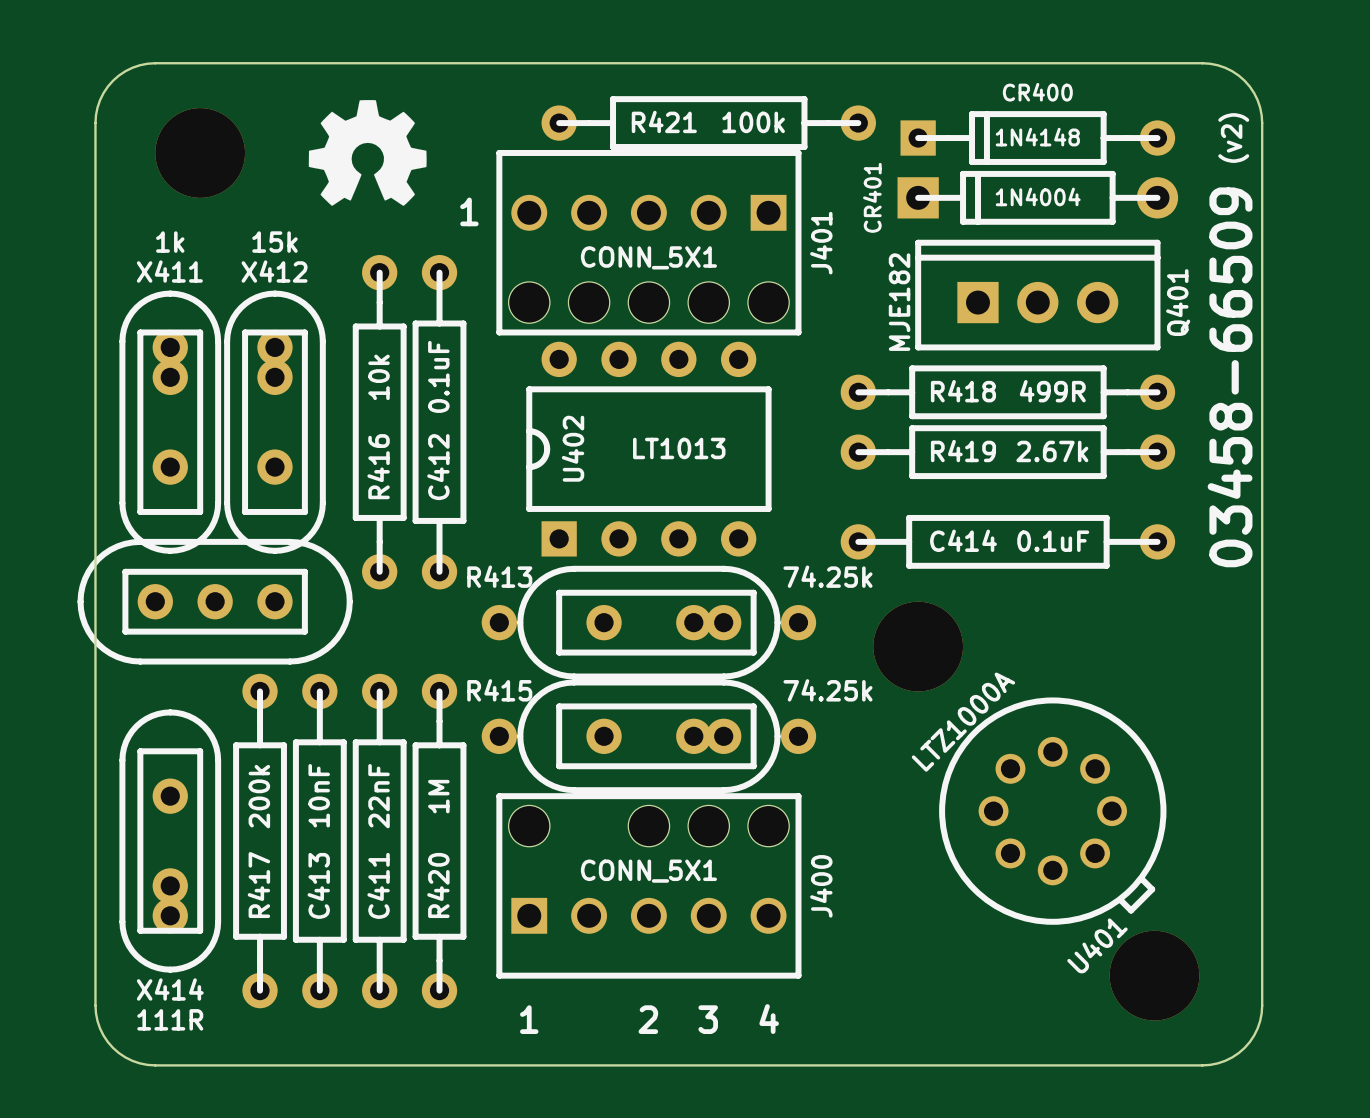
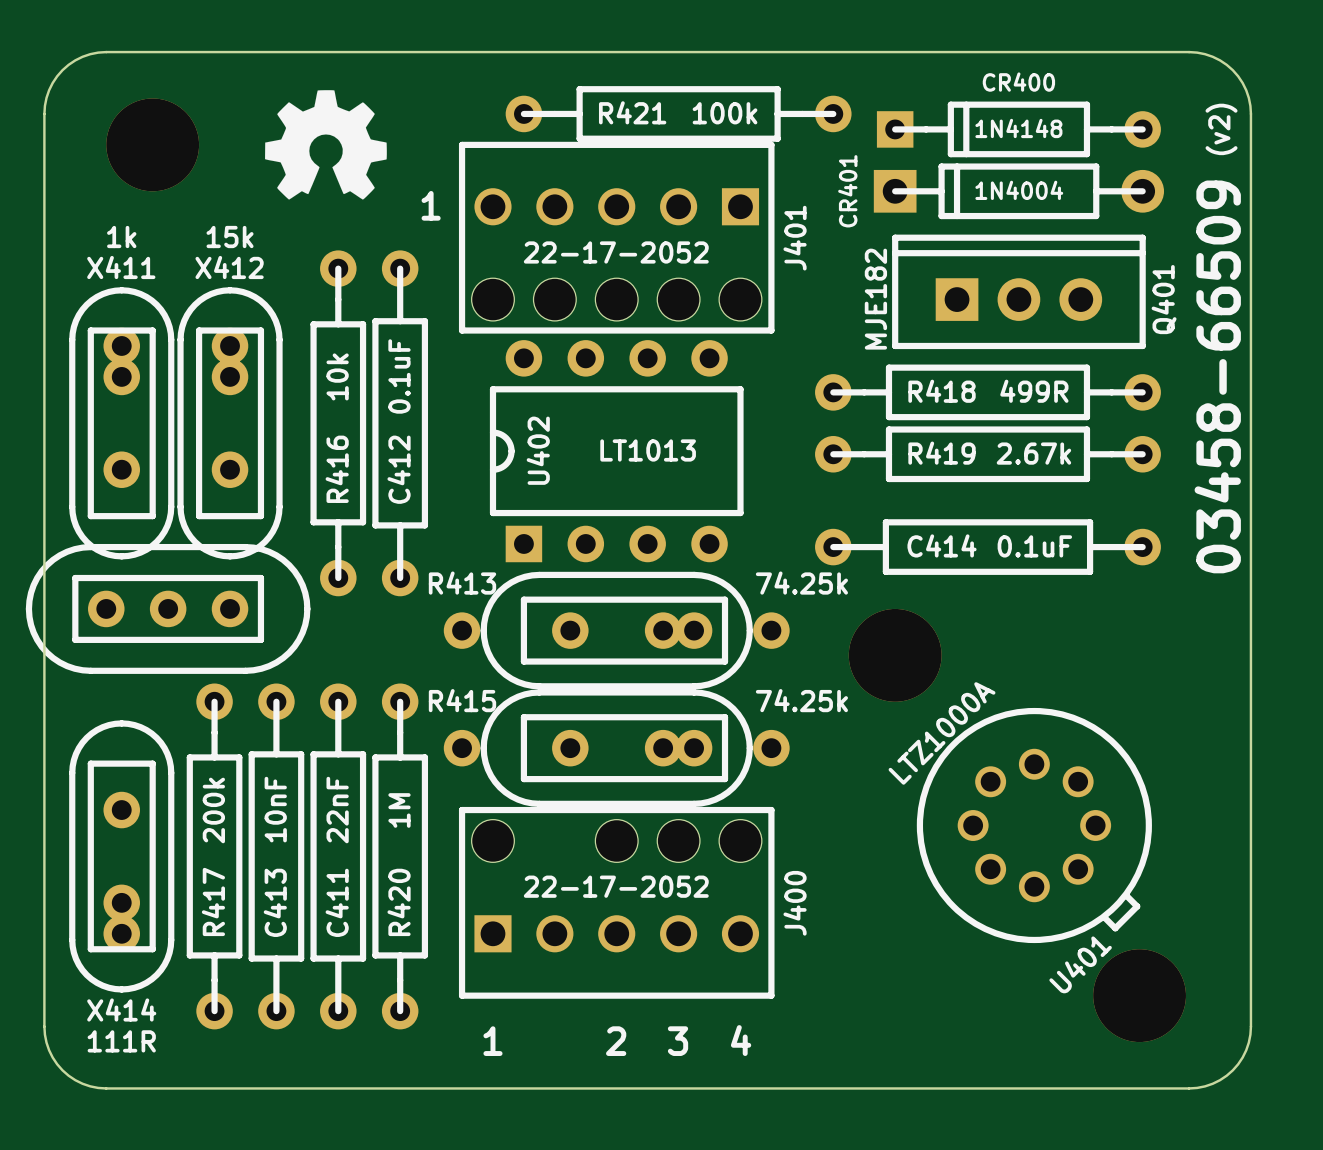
J401 value: CONN_5X1 (648, 257) -> 22-17-2052 (616, 252)
J400 value: CONN_5X1 (648, 871) -> 22-17-2052 (616, 886)

